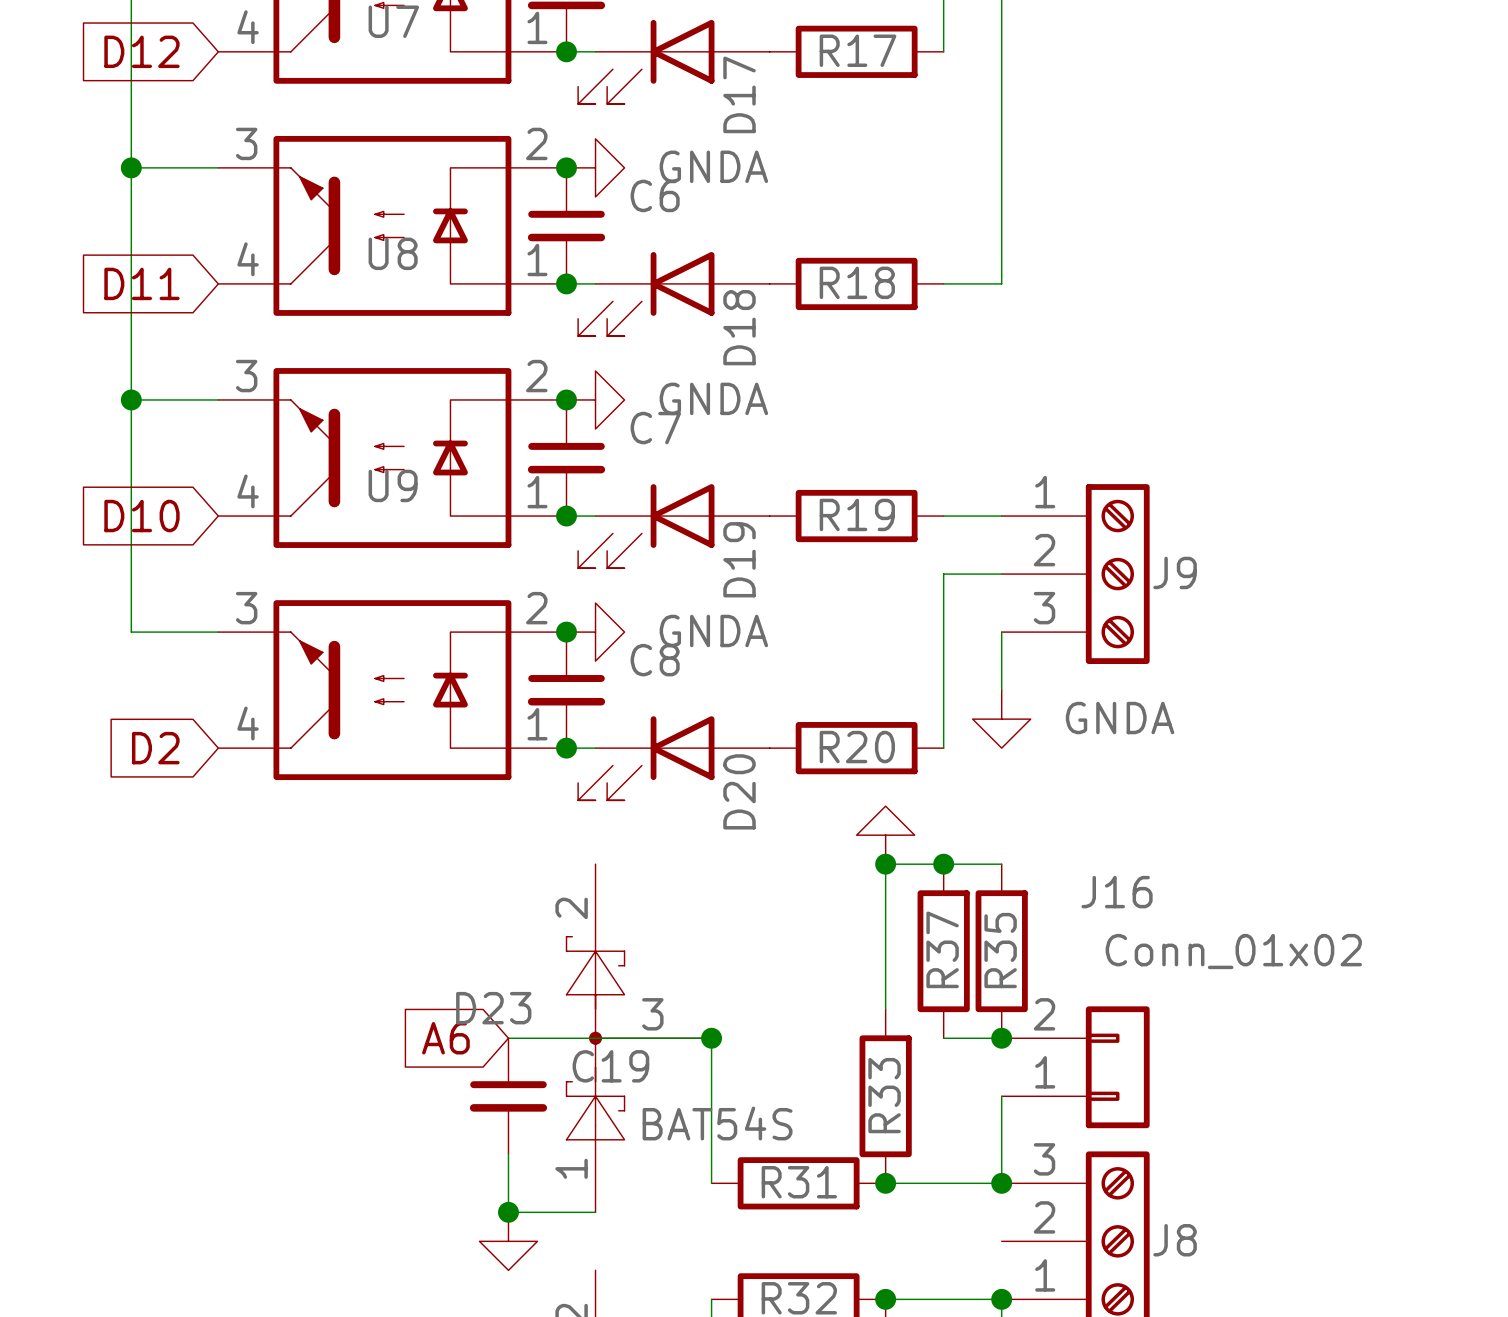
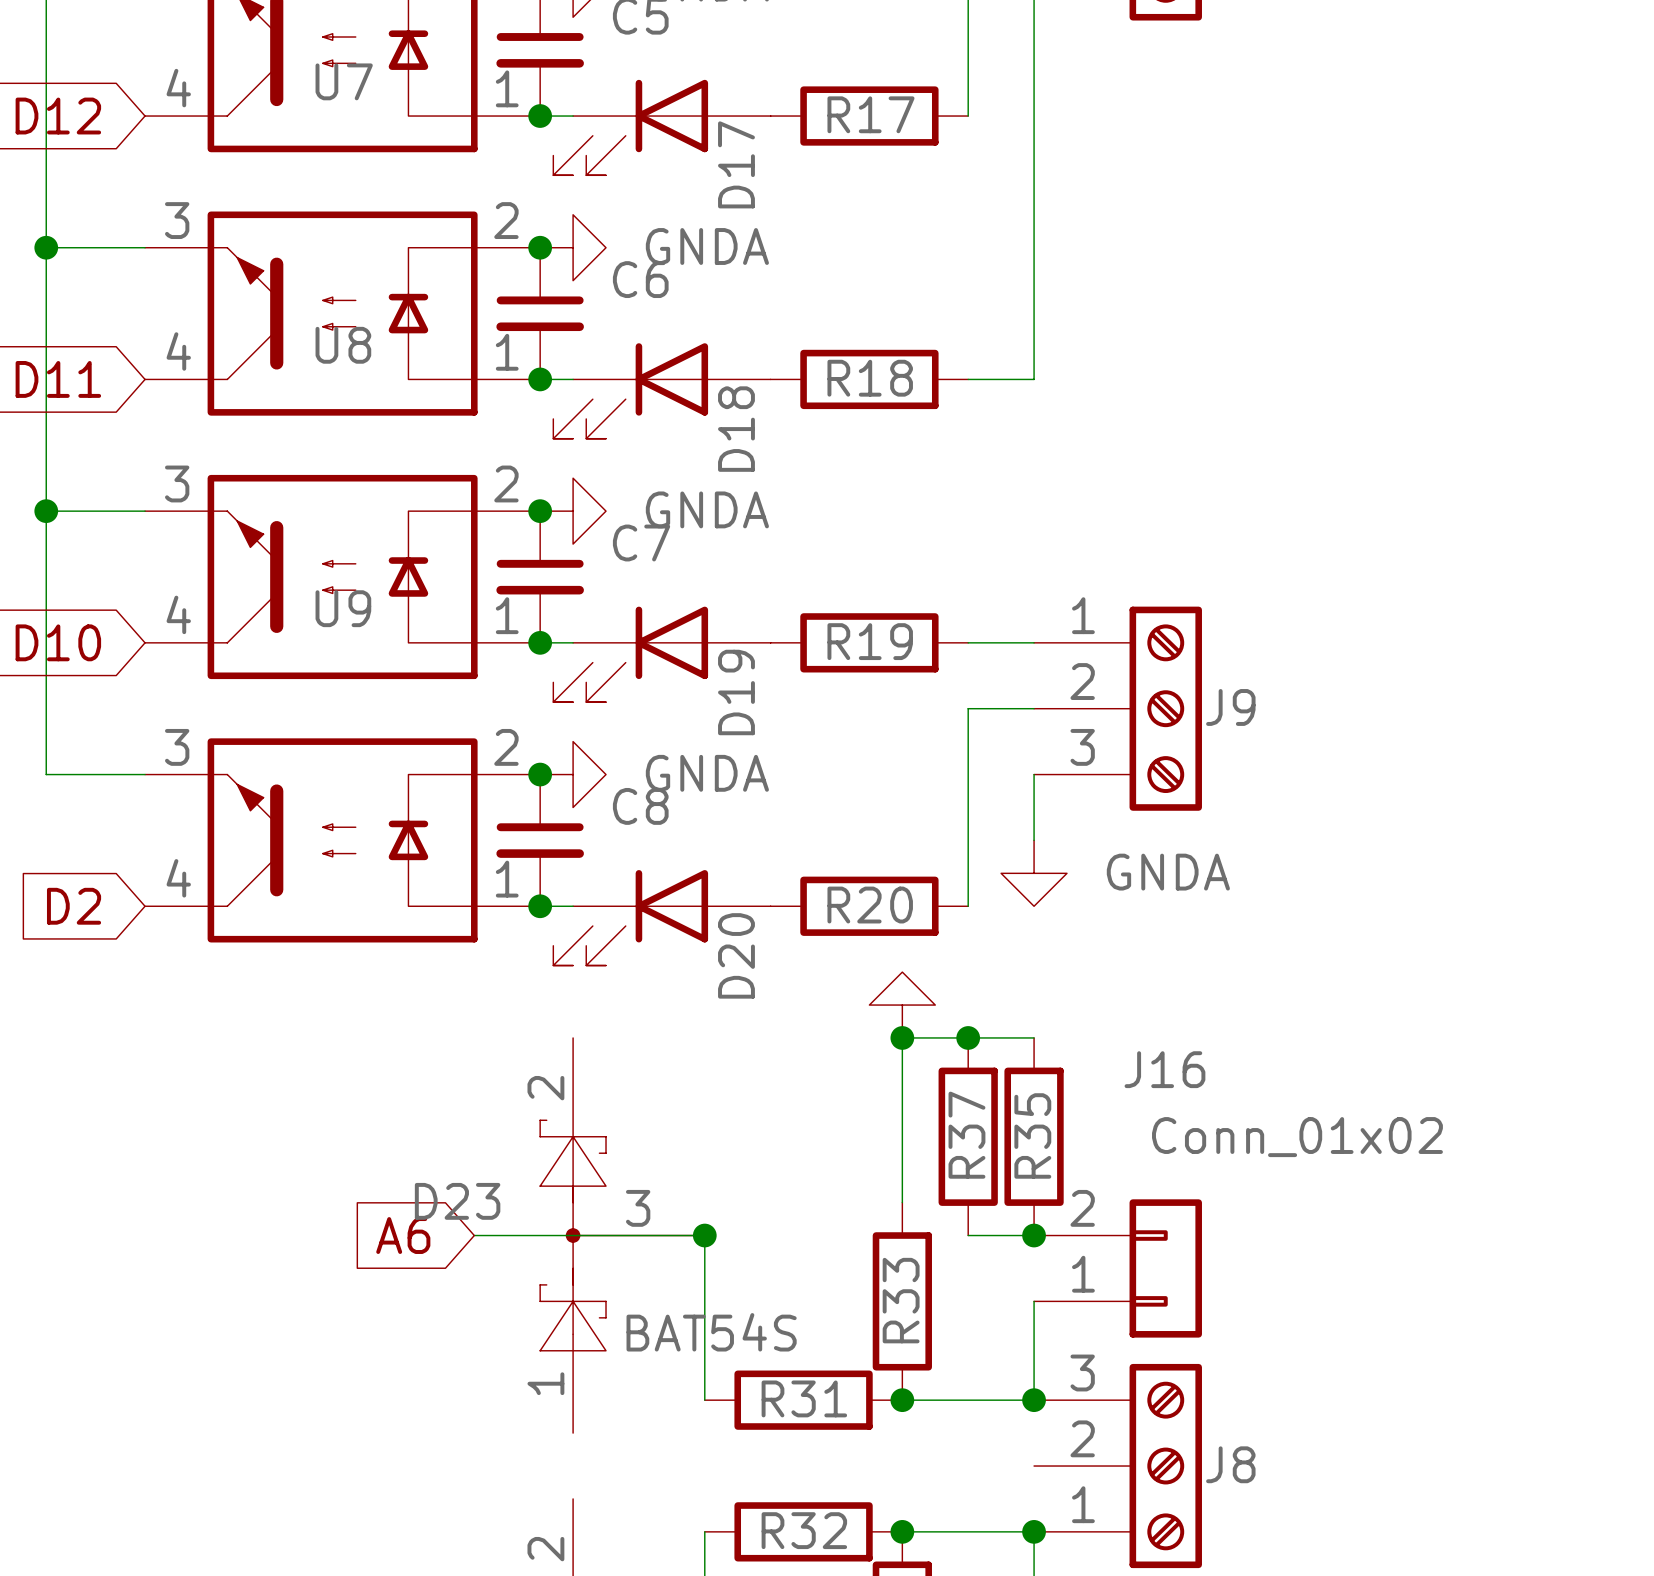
C19: (508, 1096) -> none
wire: (508, 1154) (508, 1212) (595, 1212) -> none
junction: (508, 1212) -> none
power symbol: (508, 1241) -> none

